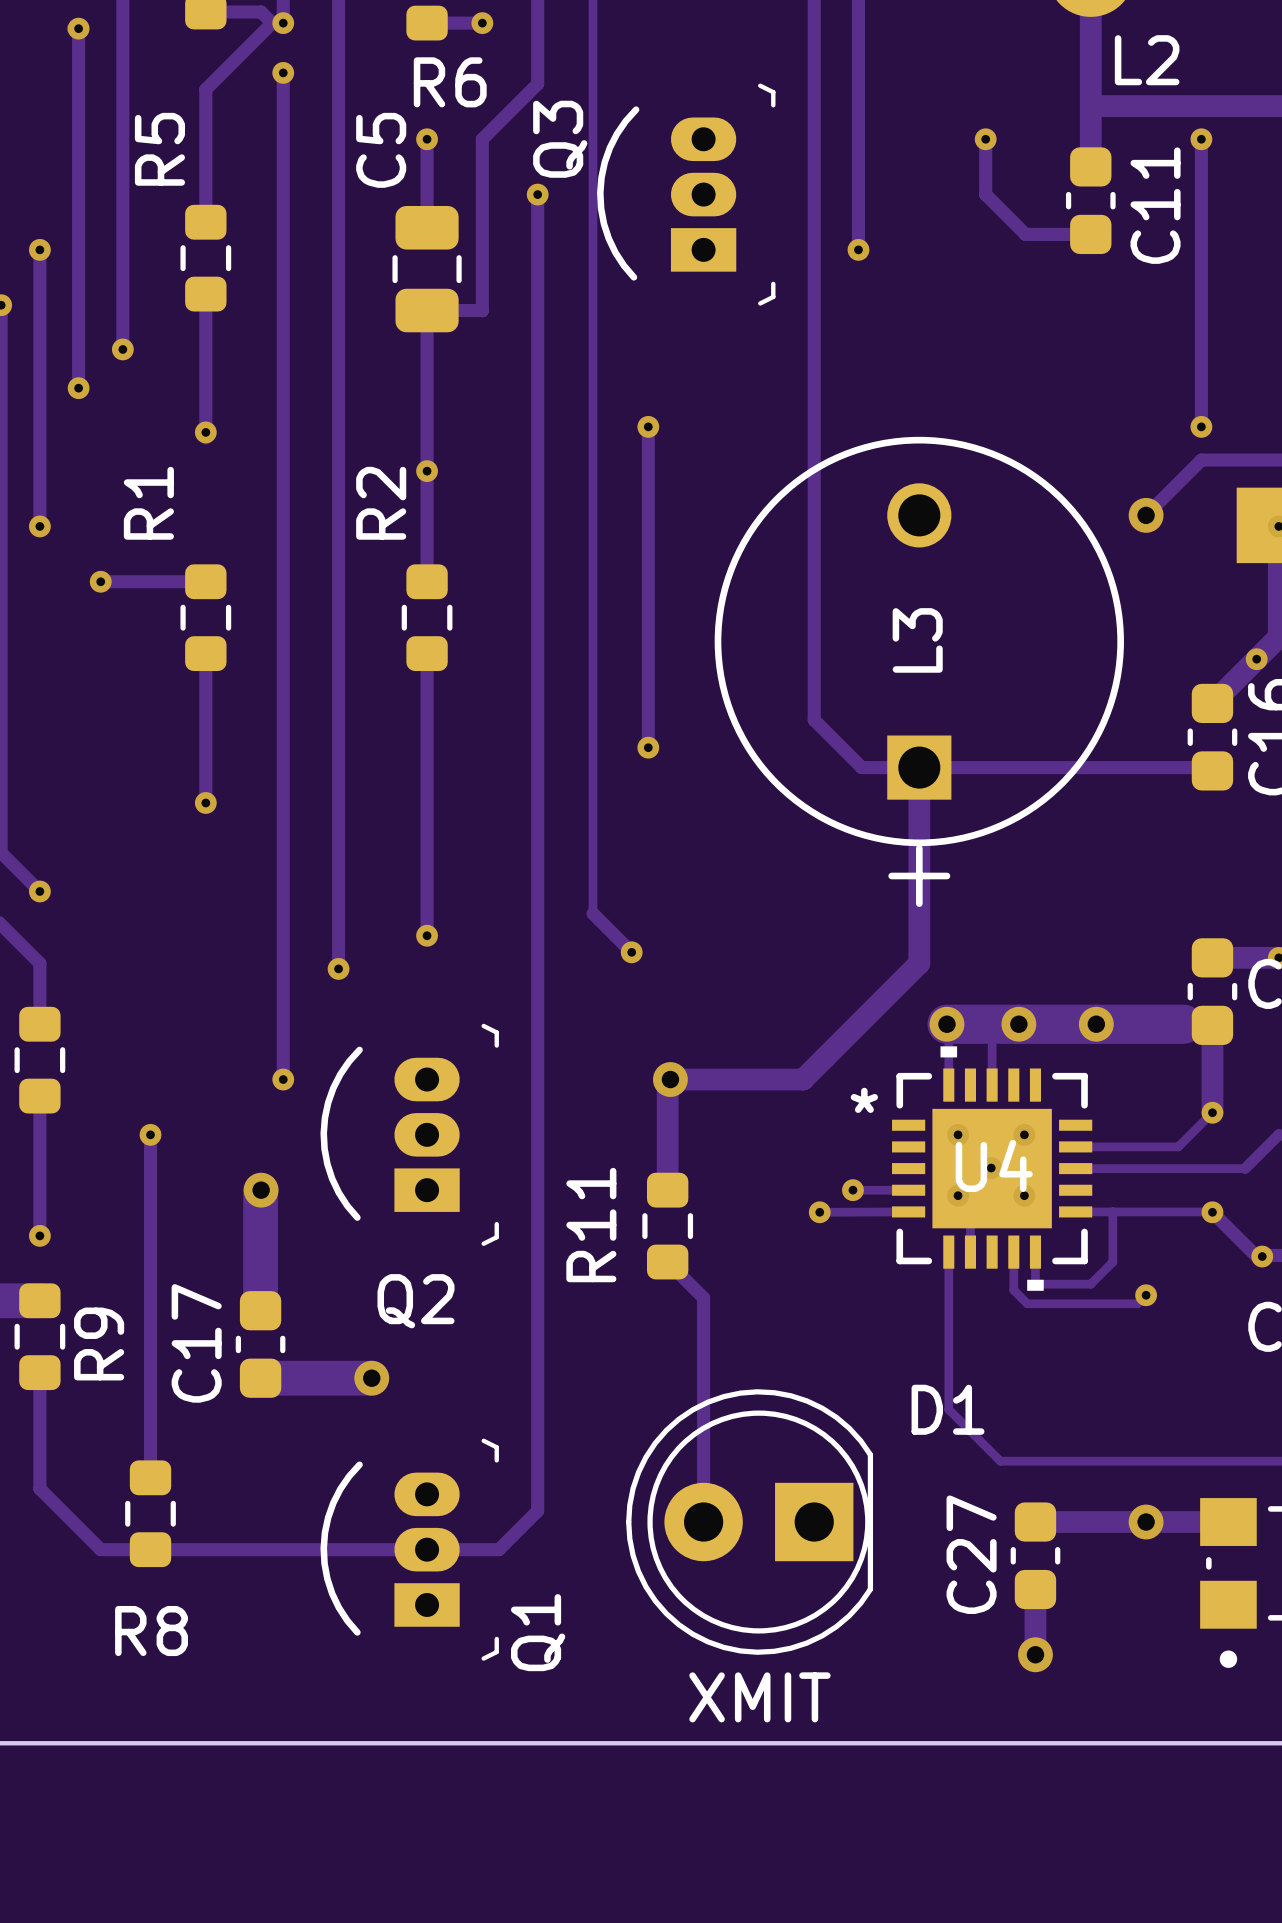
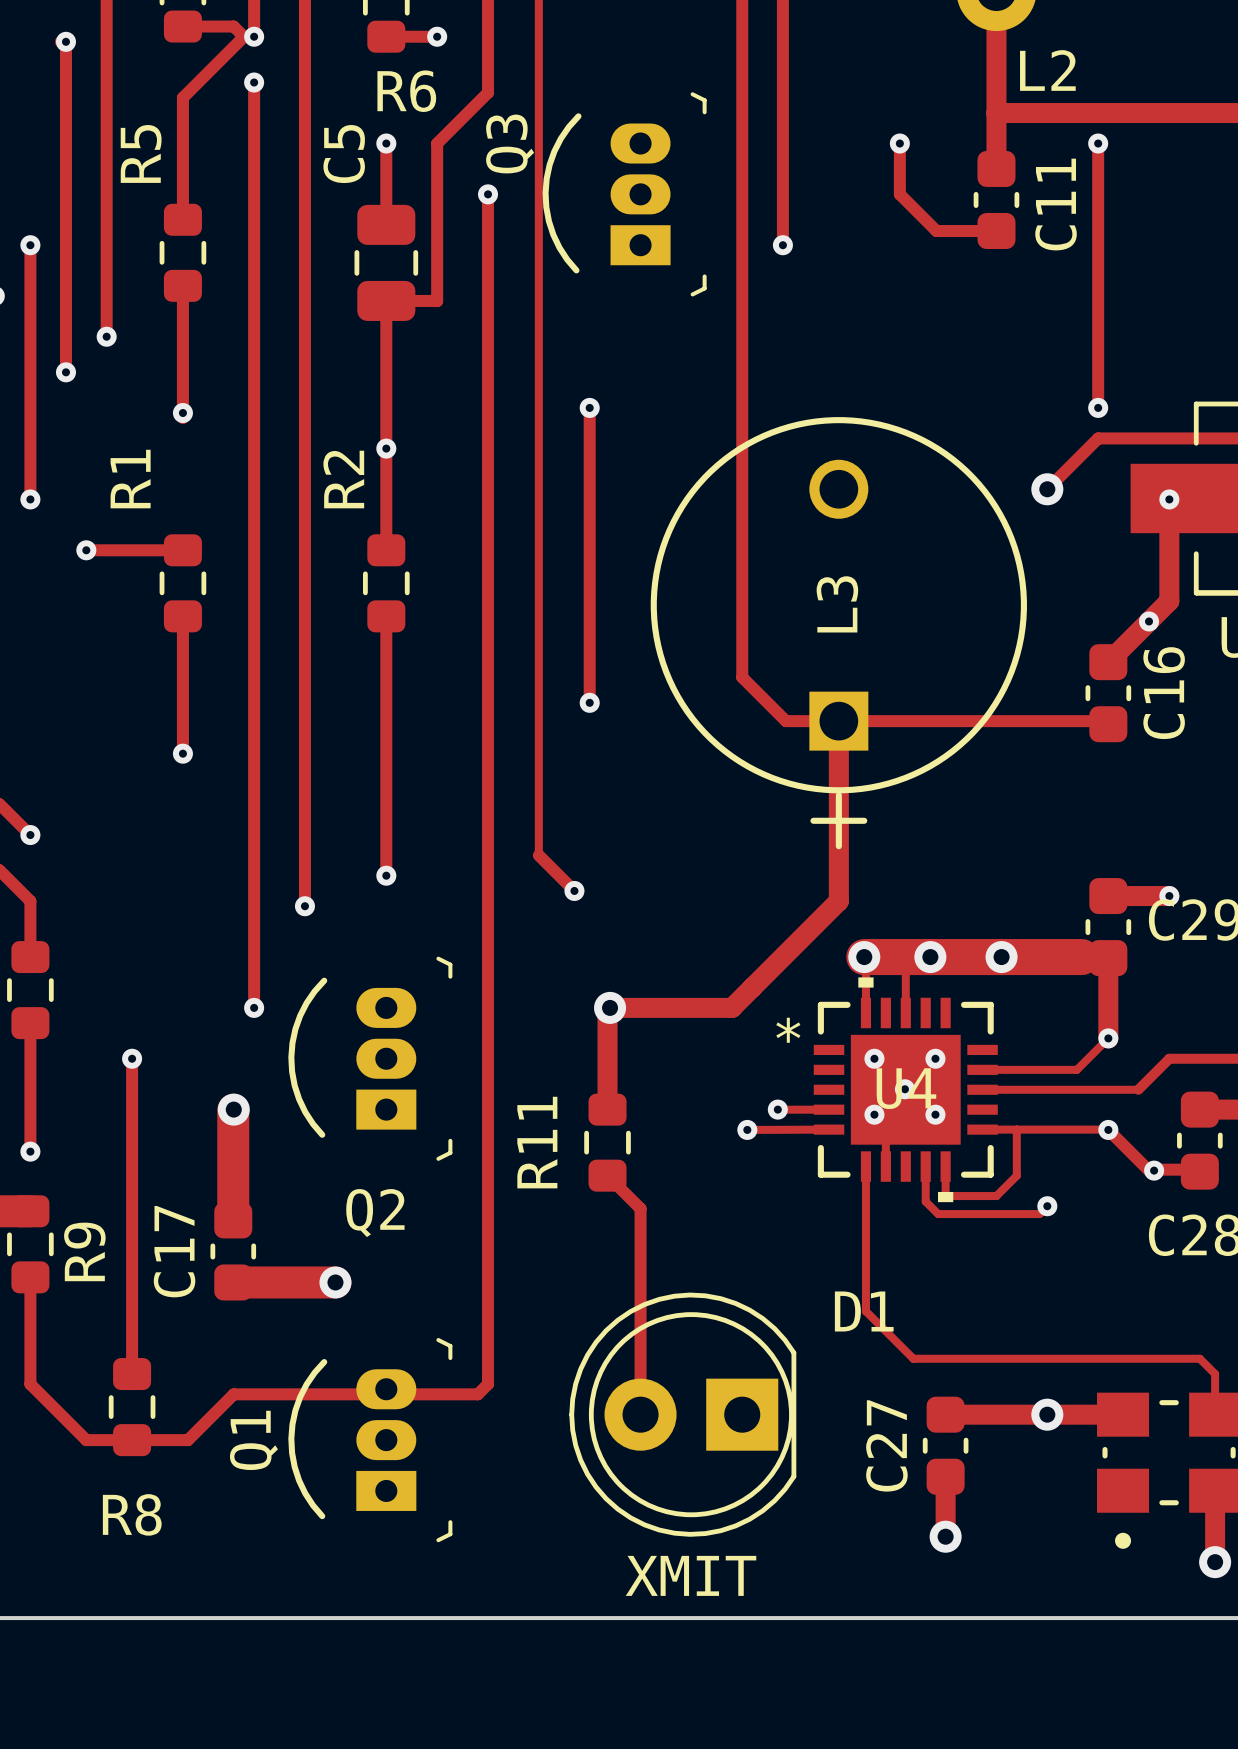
track: (537, 1488) (537, 1510) (498, 1549) (211, 1549) -> (488, 1384) (477, 1394) (233, 1394) (188, 1440)
Q1 name position: Q1 (538, 1632) -> Q1 (253, 1440)

